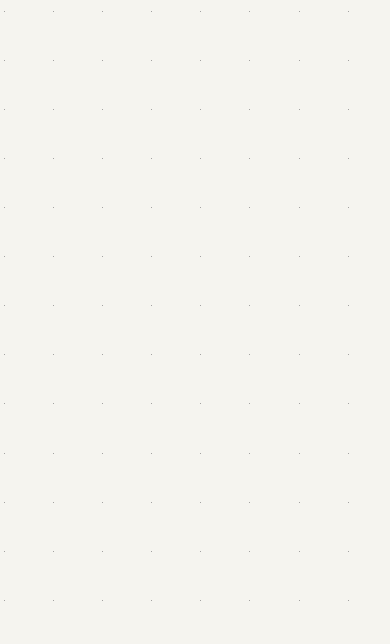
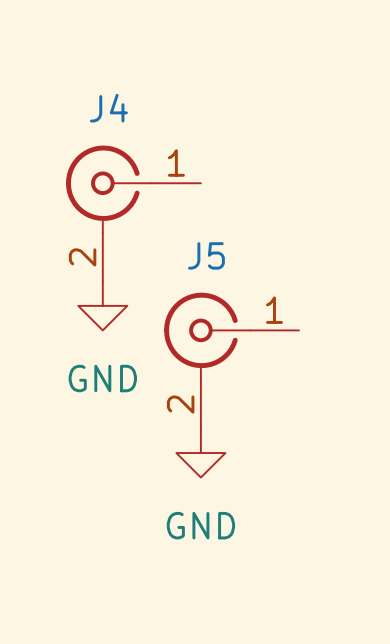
J4: none -> (133, 213)
power symbol: none -> GND (102, 305)
J5: none -> (231, 360)
power symbol: none -> GND (200, 453)

